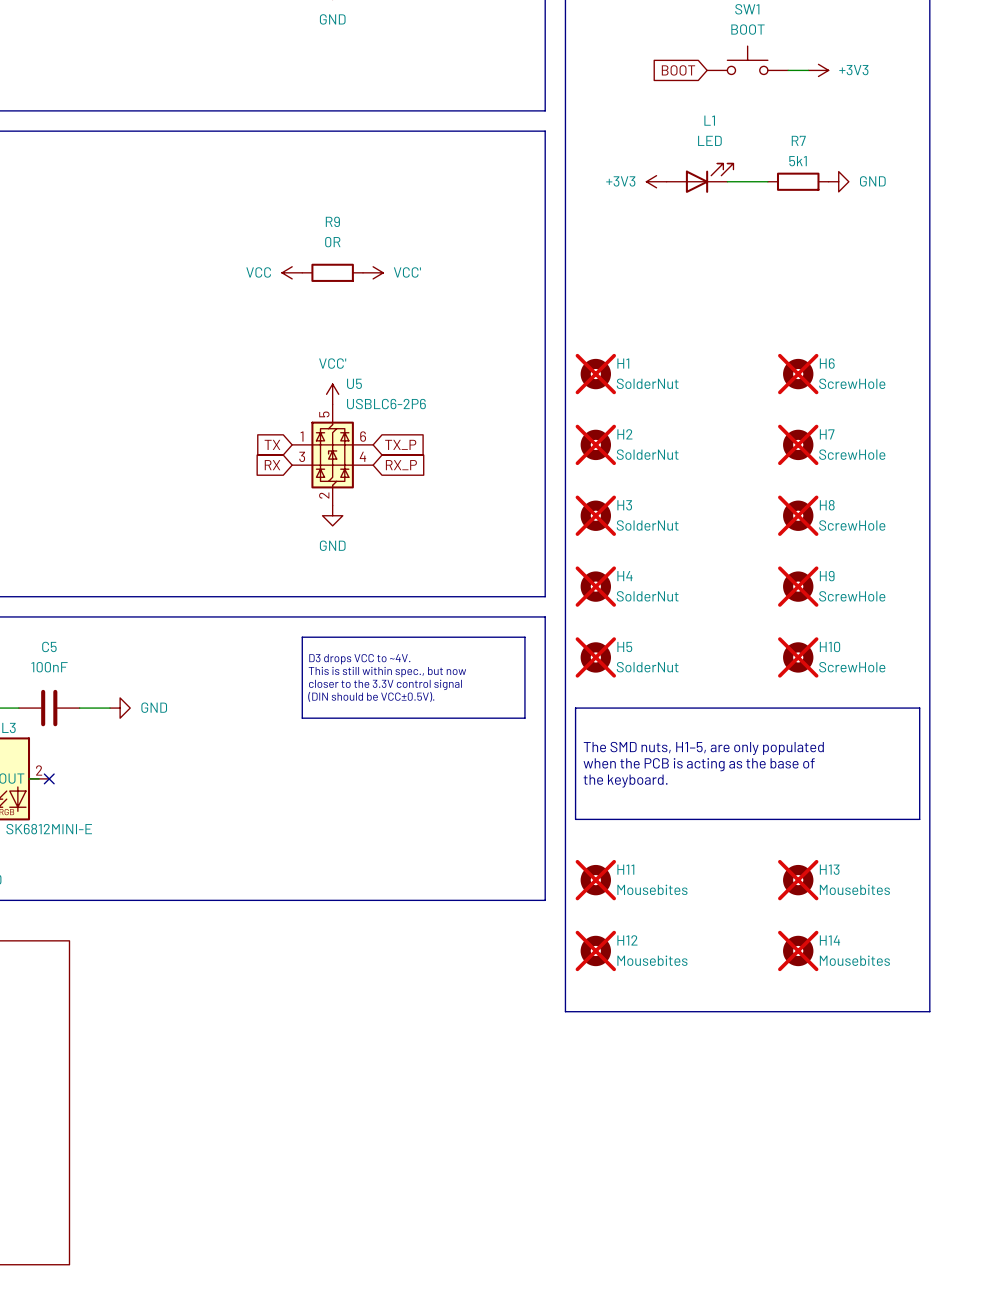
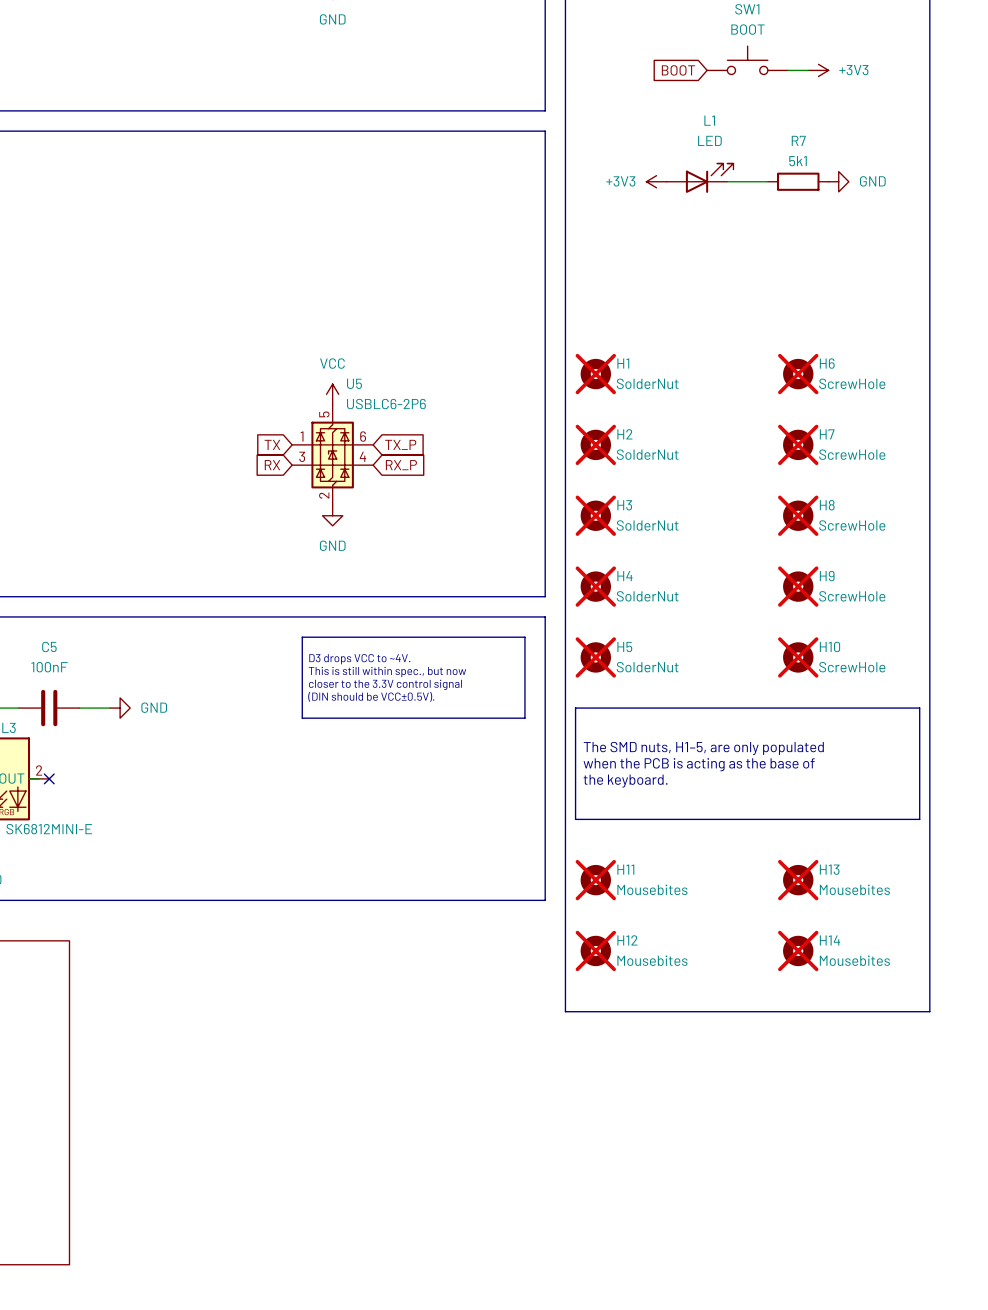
power symbol: VCC (292, 272) -> none
R9: 0R (332, 272) -> none
power symbol: VCC' (373, 272) -> none
power symbol: VCC' (332, 394) -> VCC (332, 394)

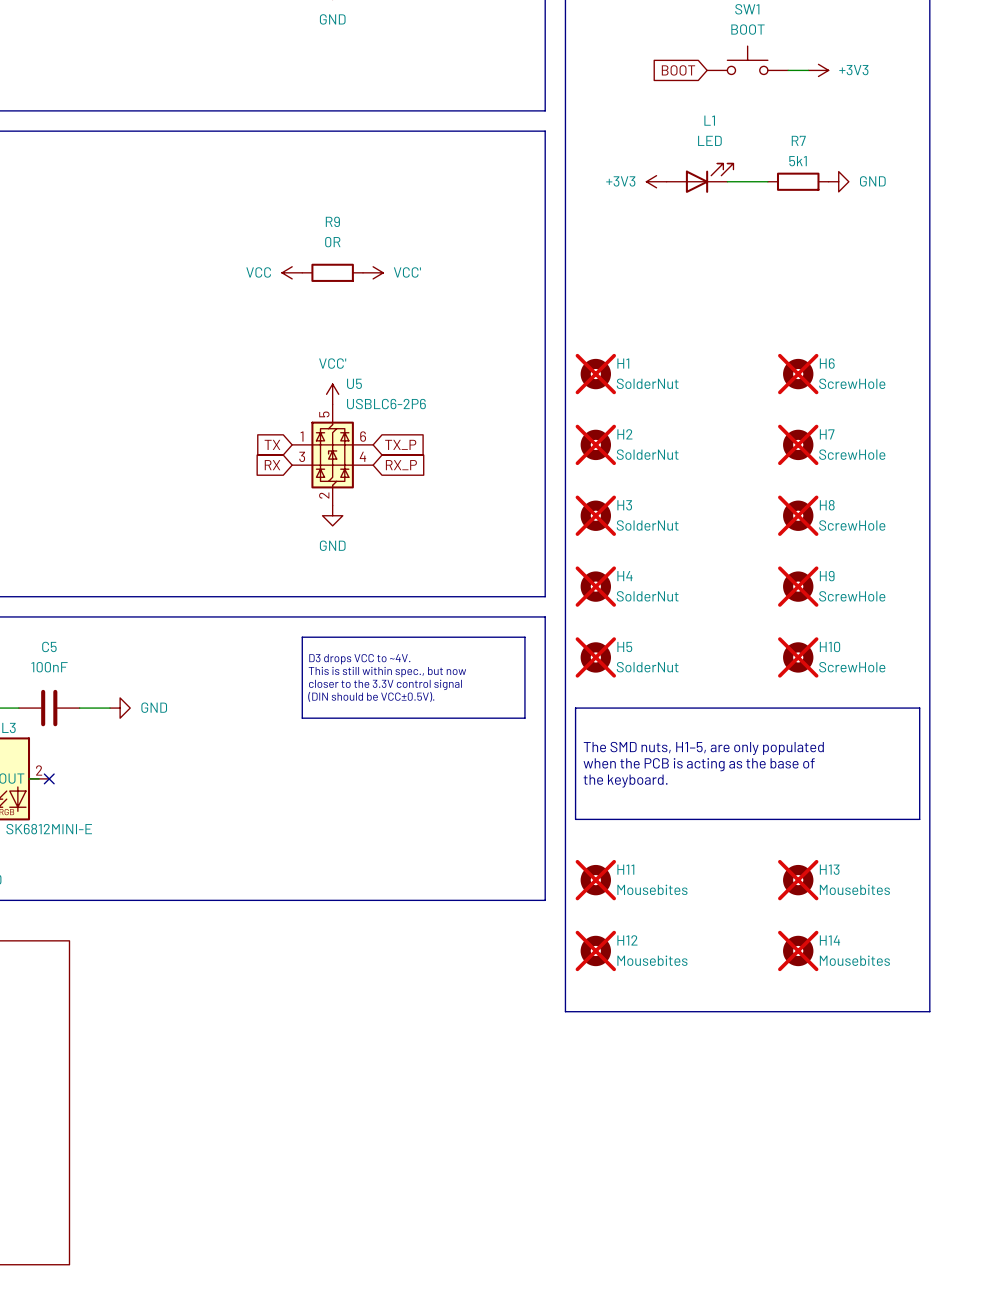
power symbol: none -> VCC (292, 272)
R9: none -> 0R (332, 272)
power symbol: none -> VCC' (373, 272)
power symbol: VCC (332, 394) -> VCC' (332, 394)

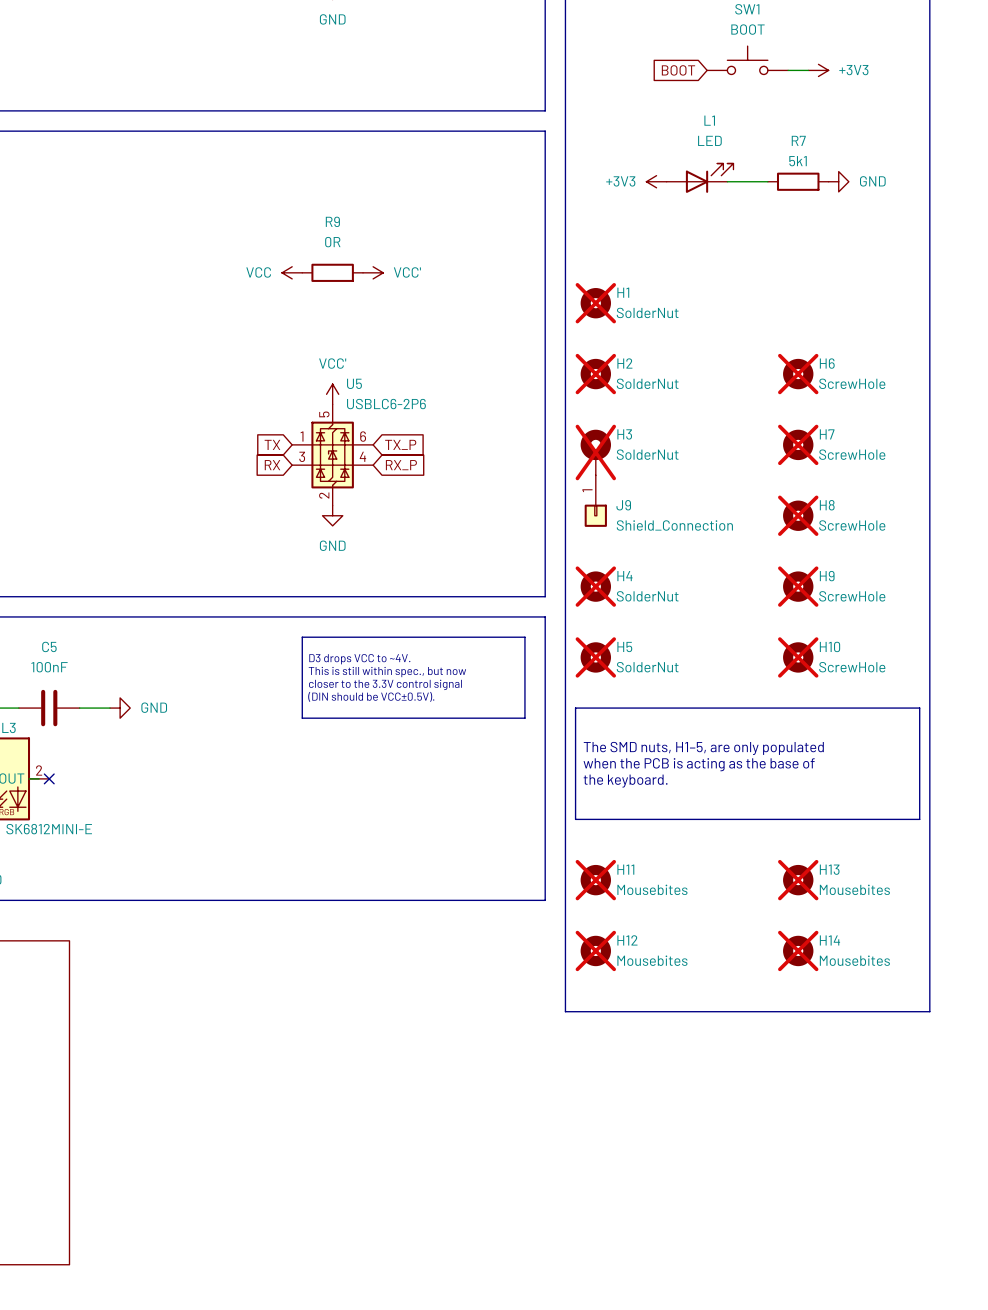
H1: none -> SolderNut (595, 303)
H1 name: H1 (623, 363) -> H2 (624, 363)
H2: SolderNut (595, 444) -> none
H3 symbol: [580, 500, 611, 531] -> [580, 429, 611, 476]
J9: none -> Shield_Connection (595, 501)

